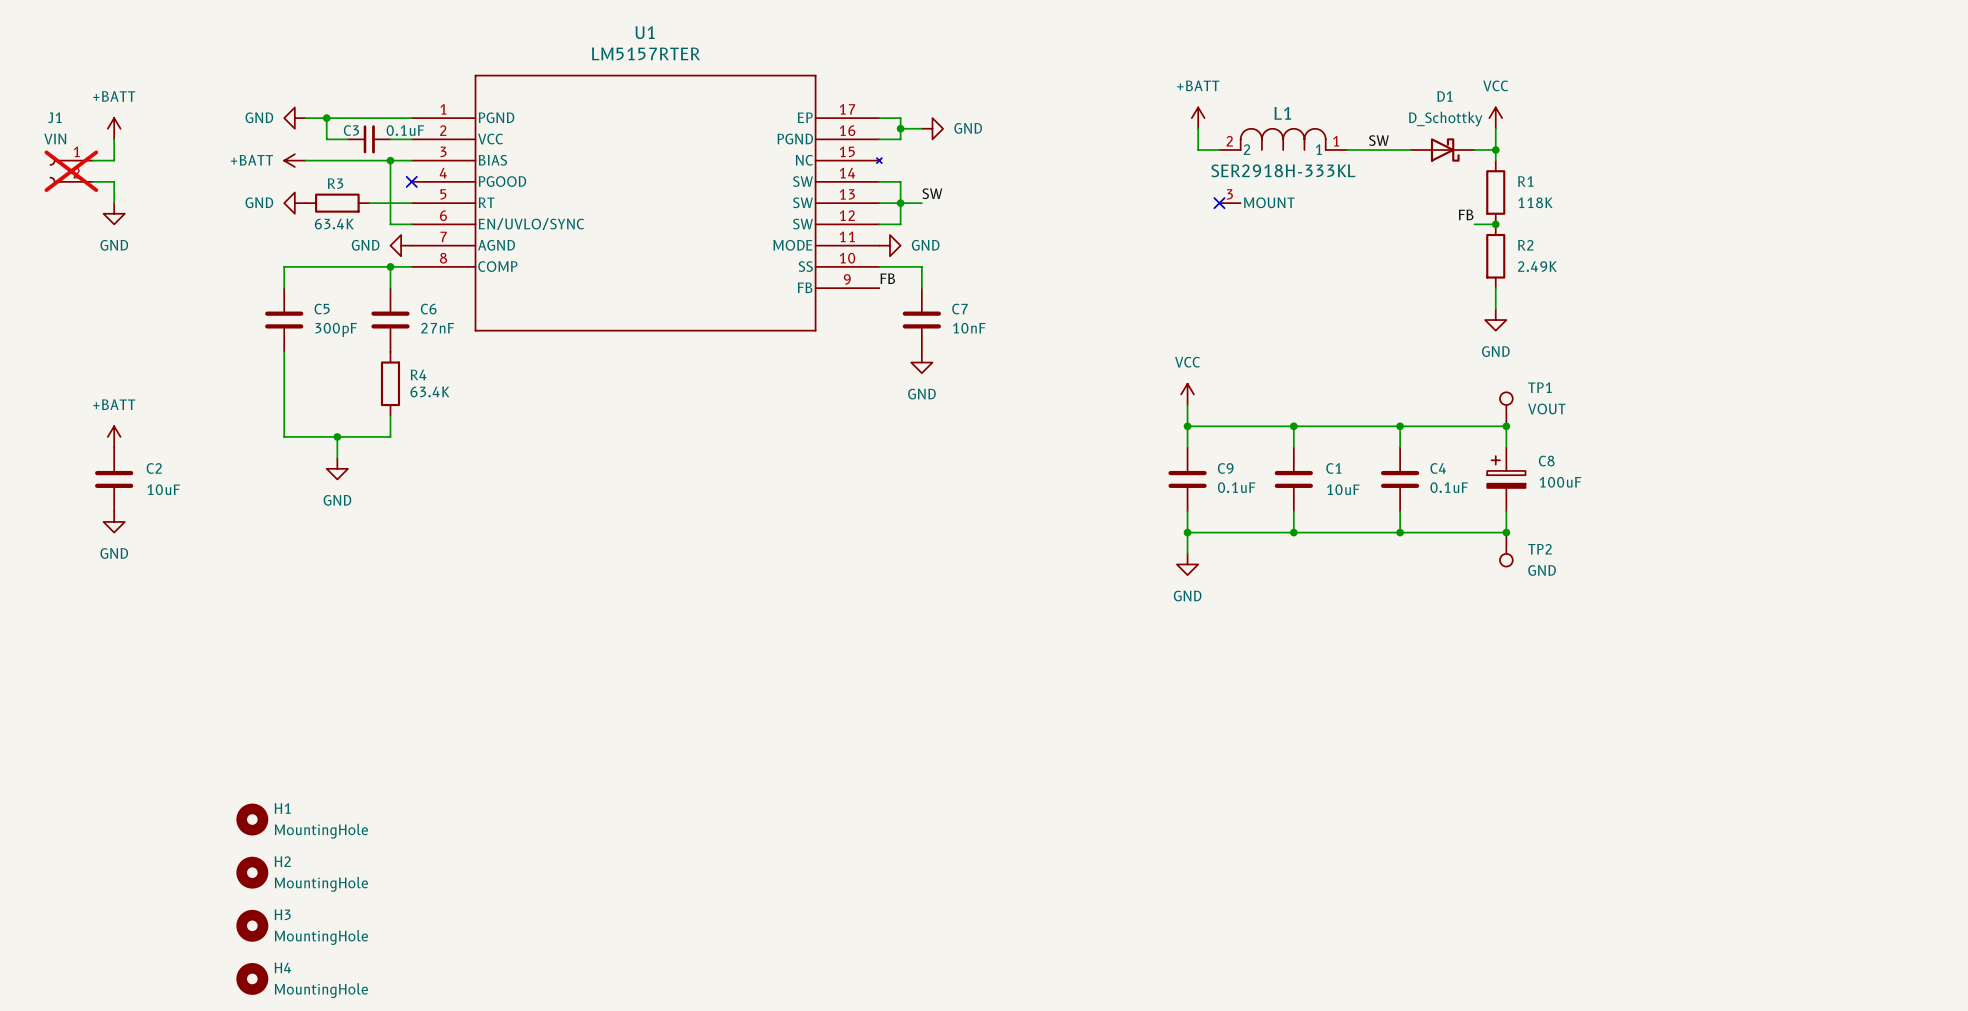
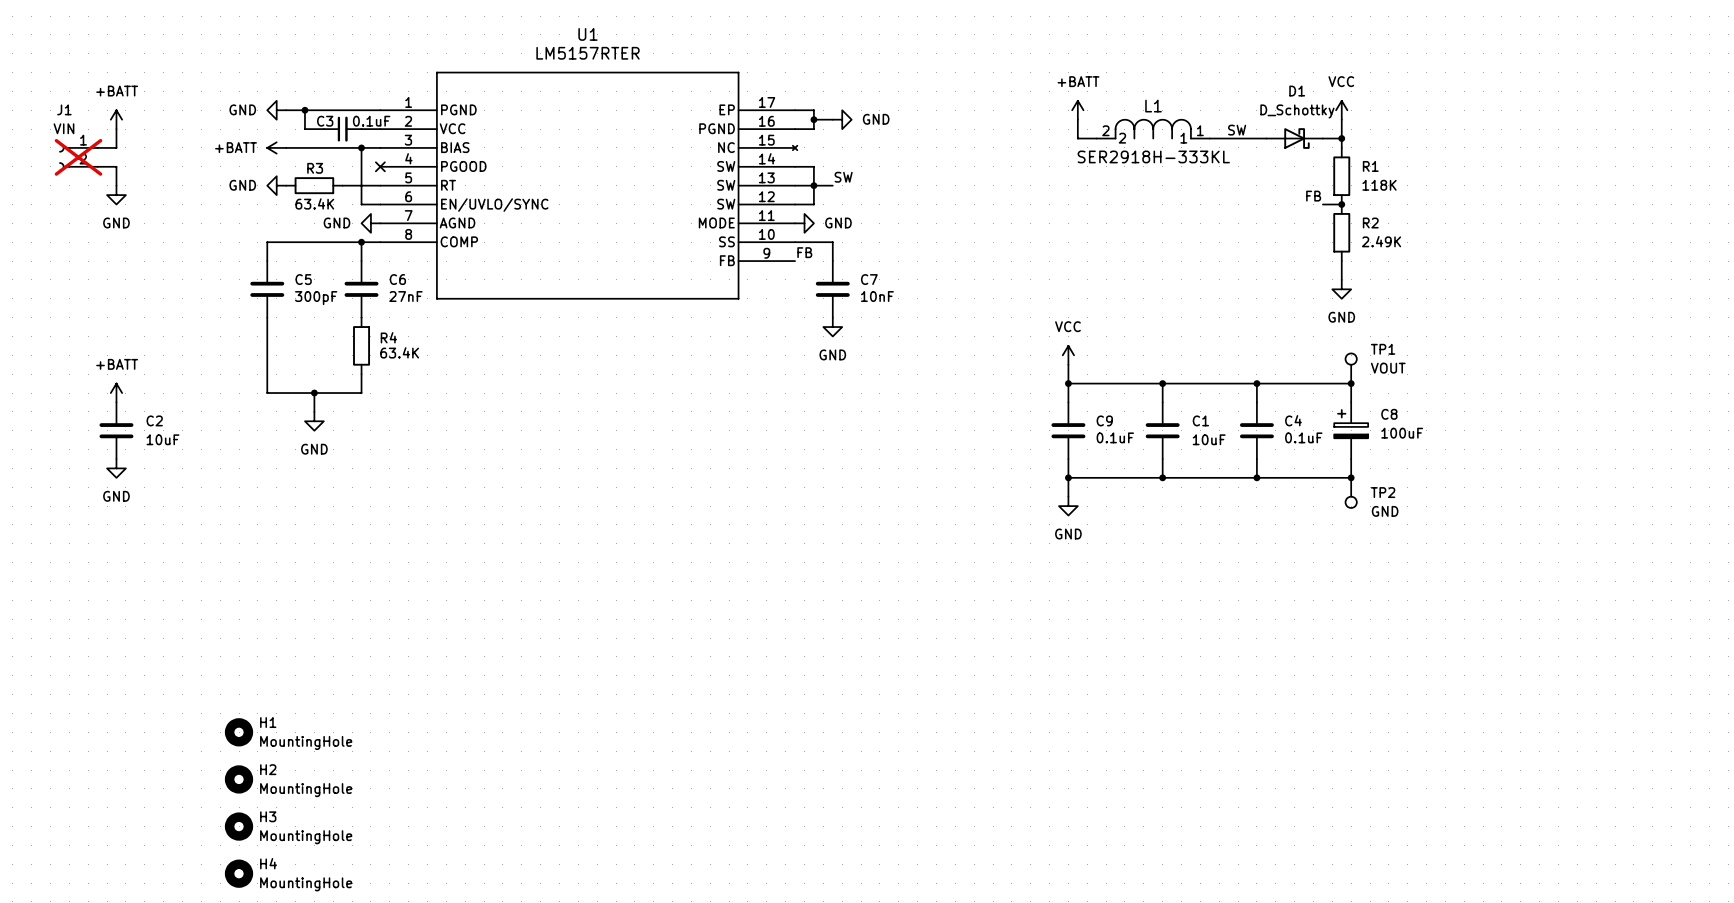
L1 symbol: [1219, 127, 1347, 204] -> [1096, 118, 1210, 140]
no-connect mark: (1219, 203) -> none

